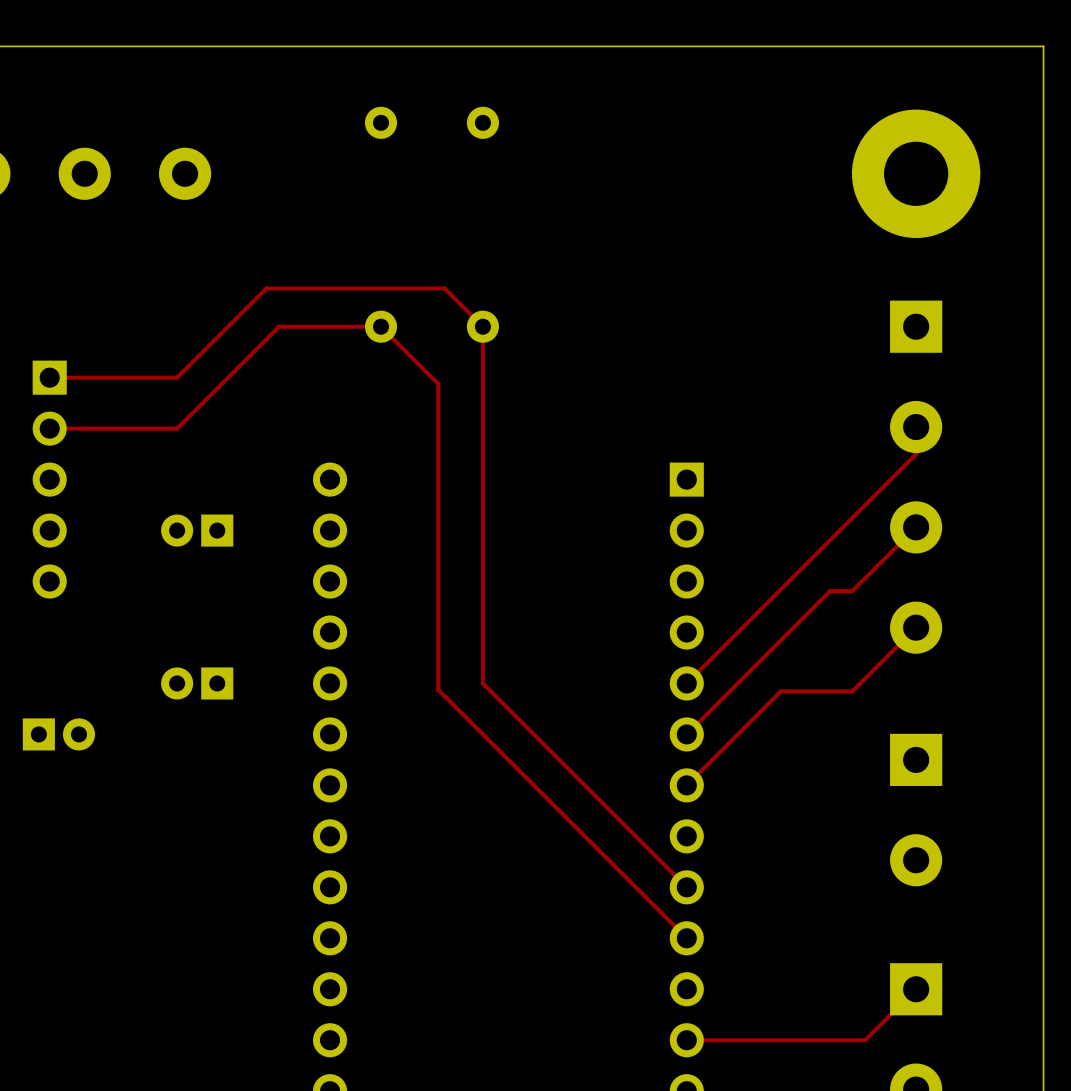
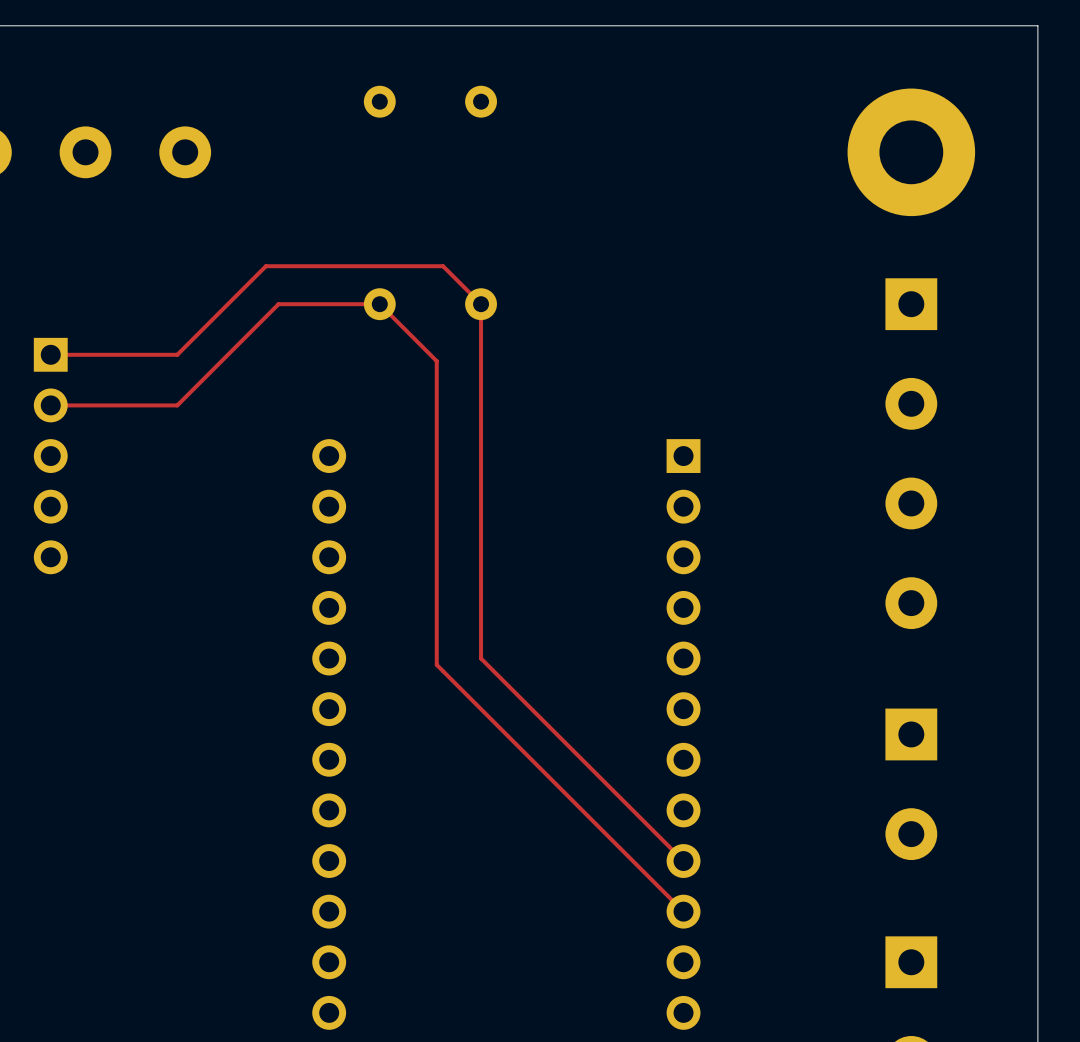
top track: (916, 427) (916, 454) (686, 683) -> none
top track: (916, 527) (852, 591) (830, 591) (686, 734) -> none
part: (197, 530) -> none
top track: (916, 627) (852, 691) (780, 691) (686, 785) -> none
part: (197, 683) -> none
part: (58, 734) -> none
top track: (916, 989) (865, 1040) (686, 1040) -> none

